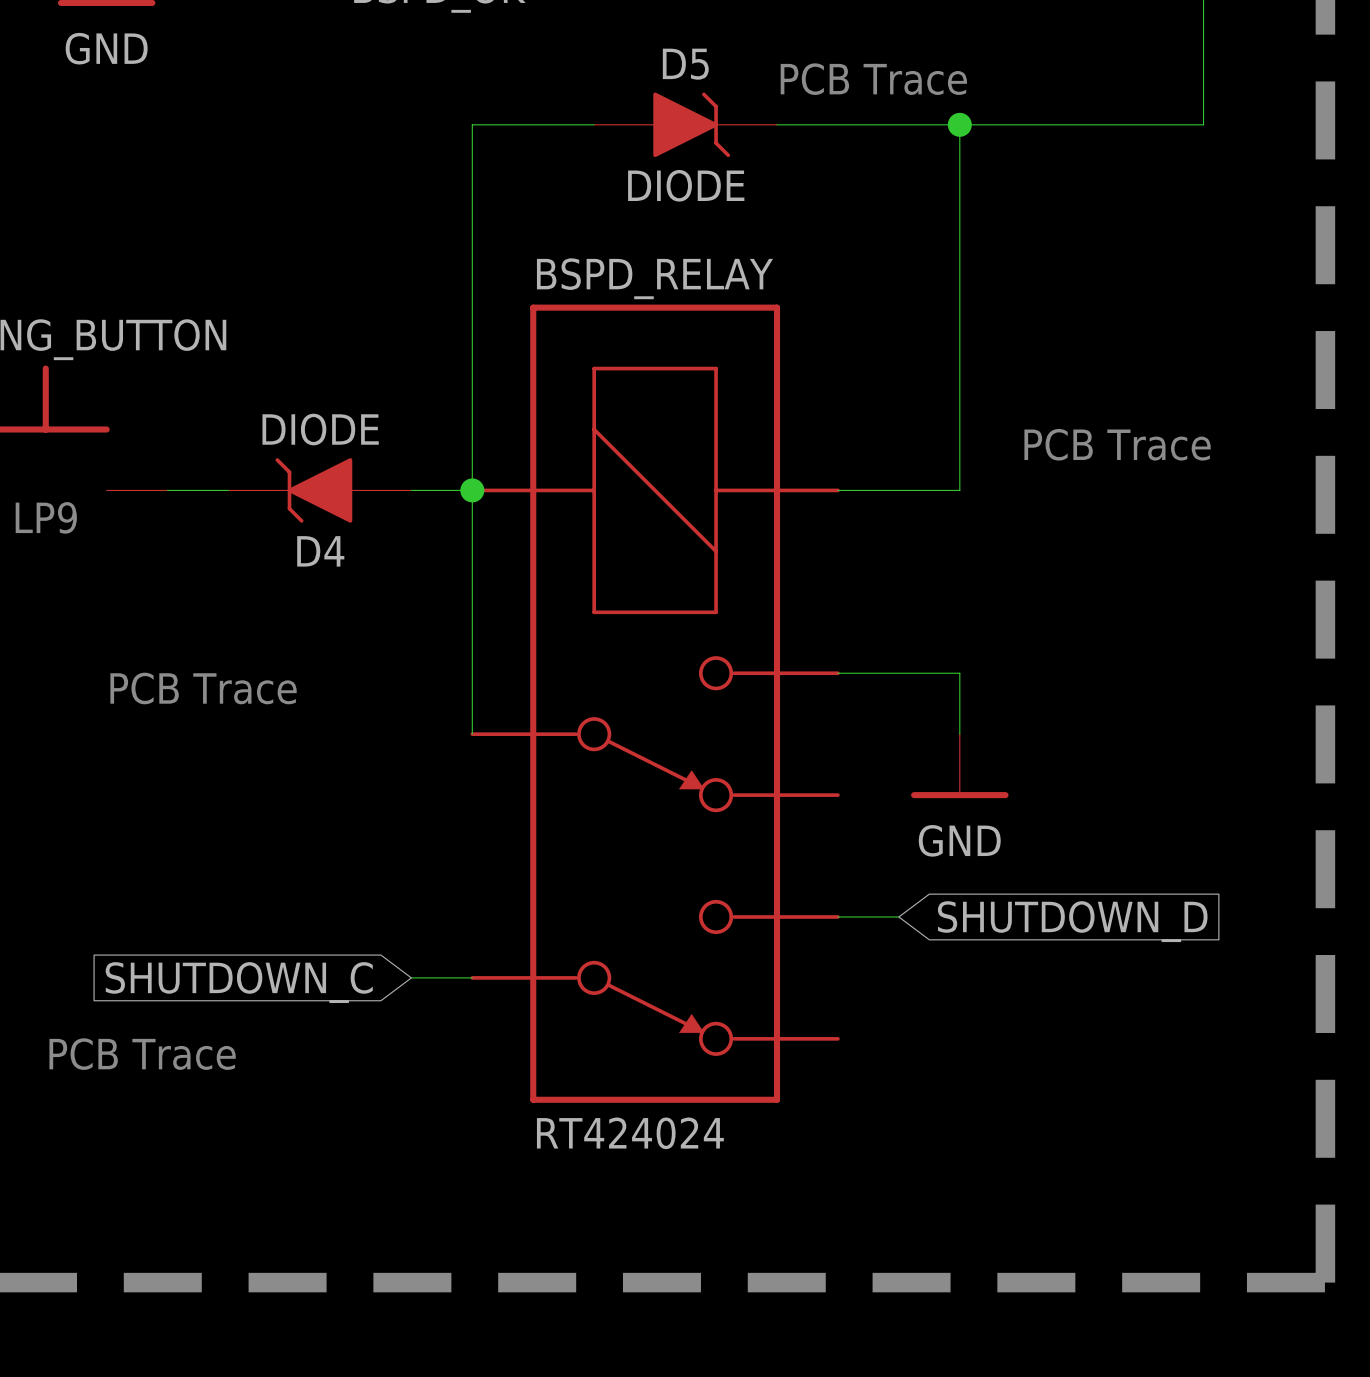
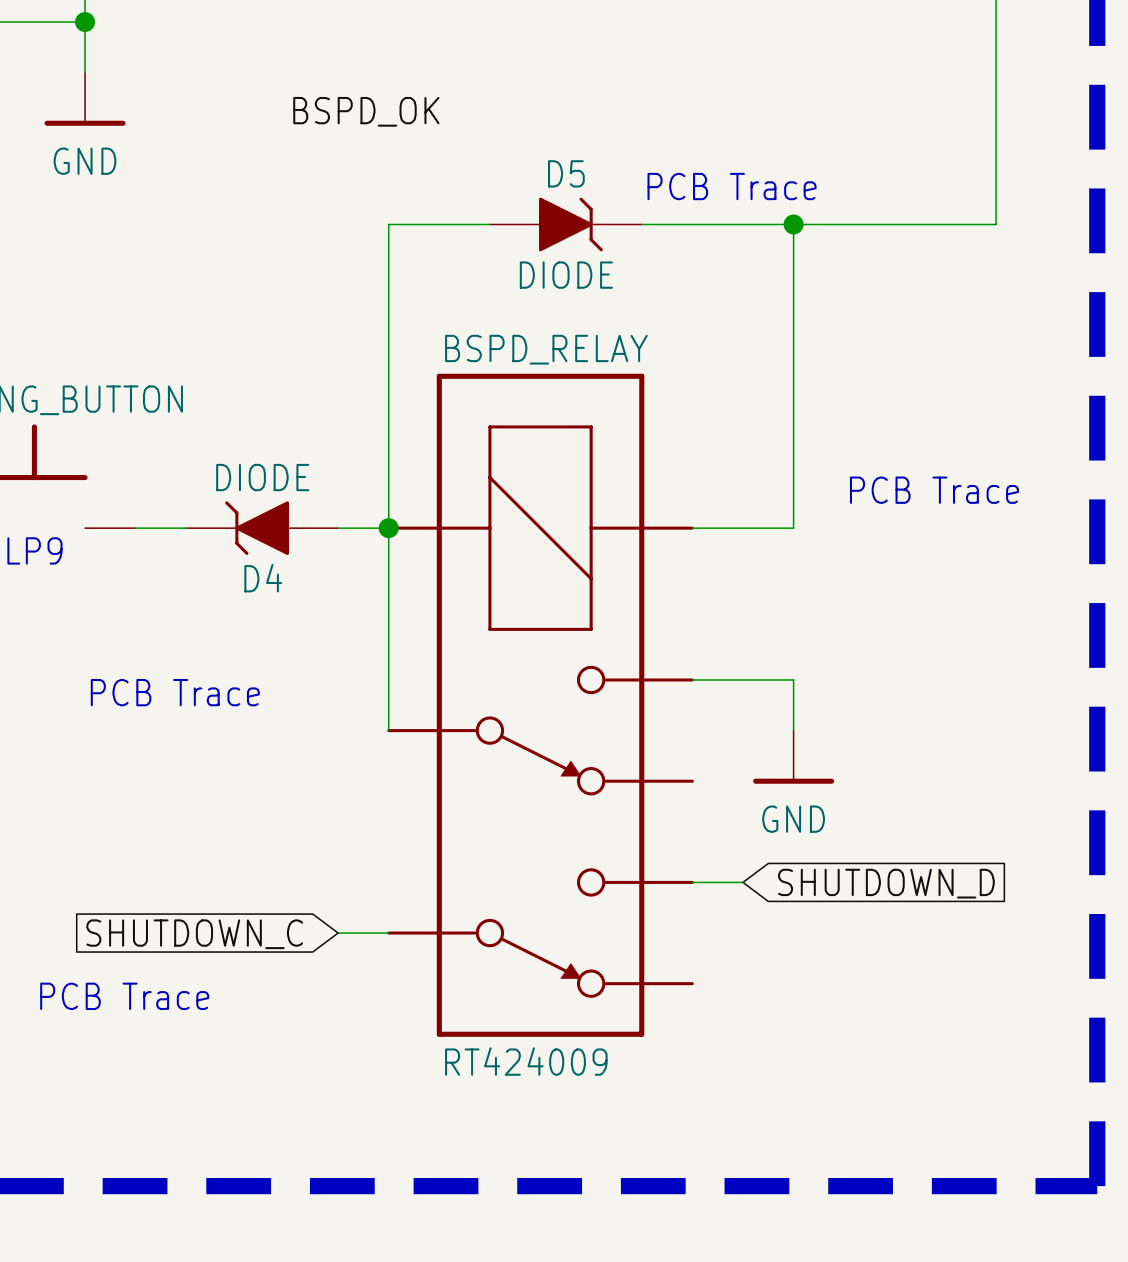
BSPD_RELAY text: RT424024 (630, 1133) -> RT424009 (526, 1061)

